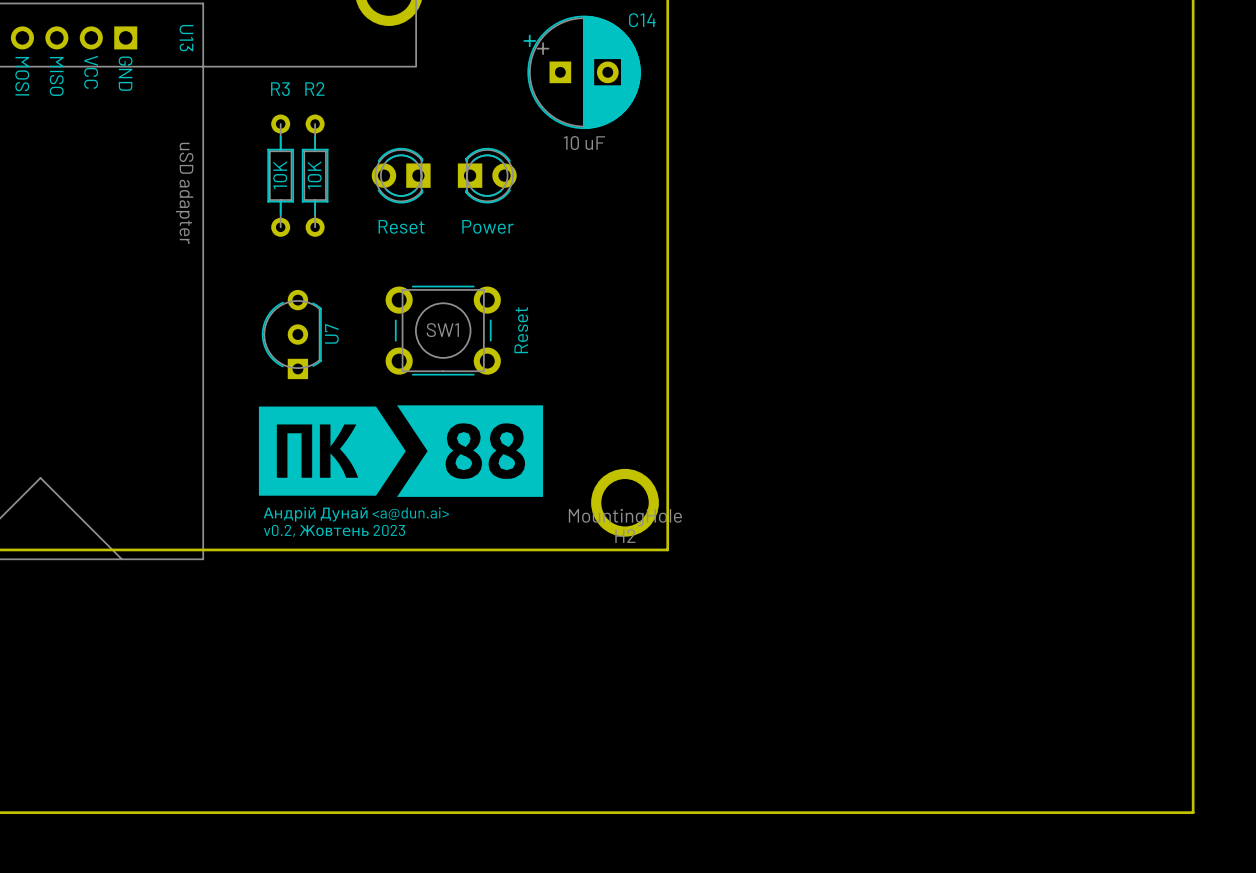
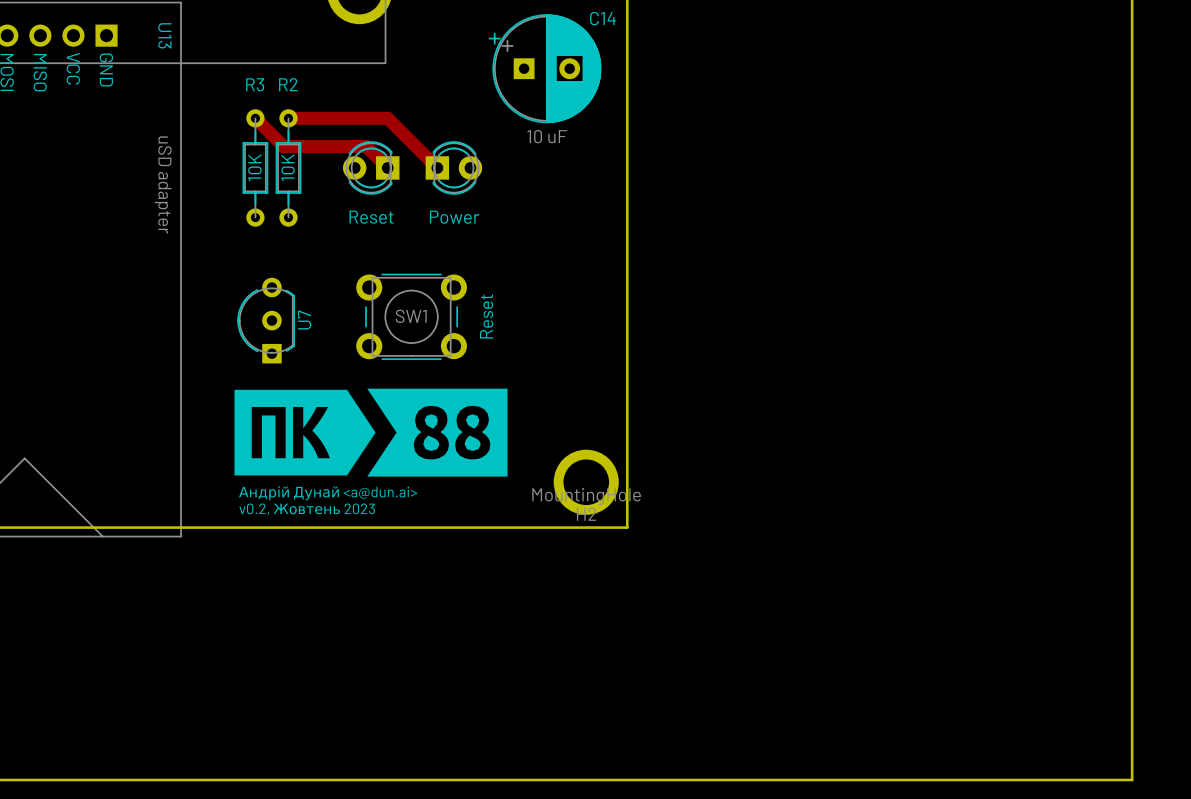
track: none -> (255, 118) (283, 146) (366, 146) (387, 167)
track: none -> (288, 118) (387, 118) (437, 167)

